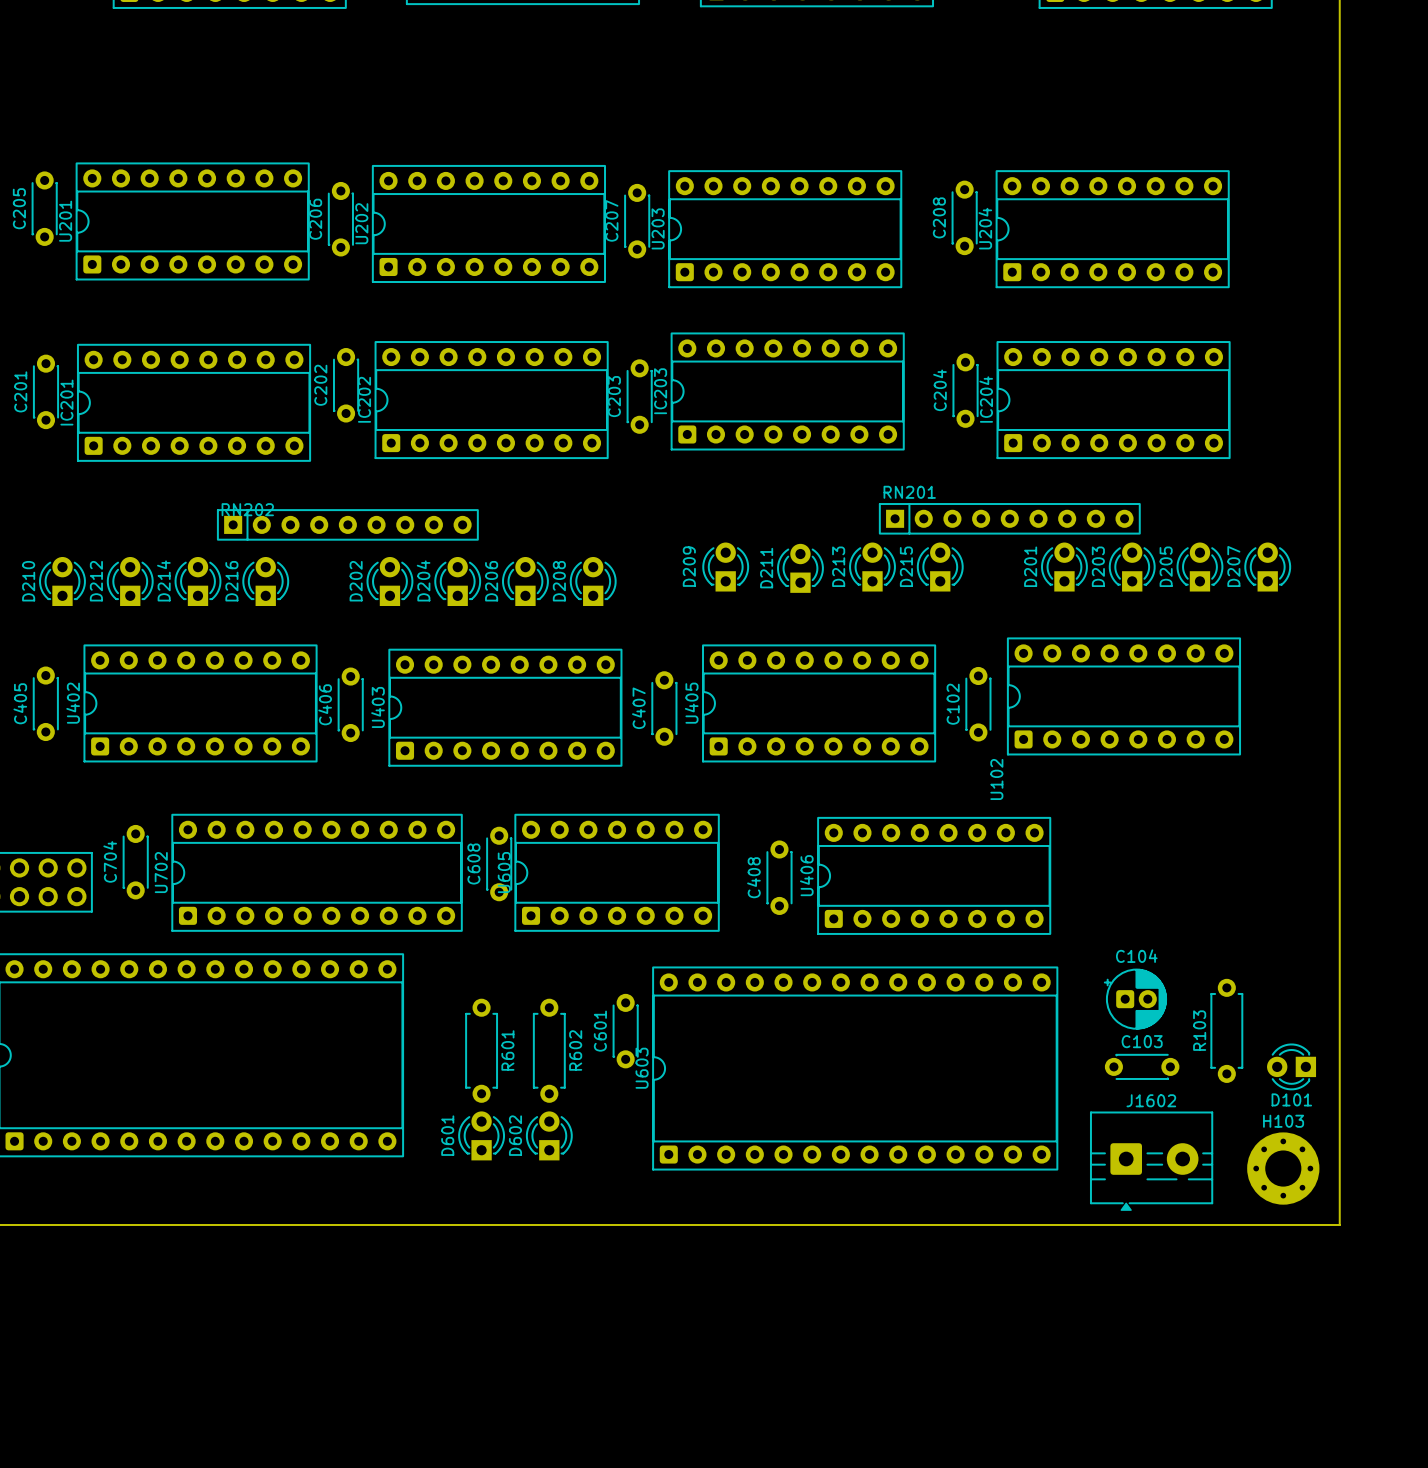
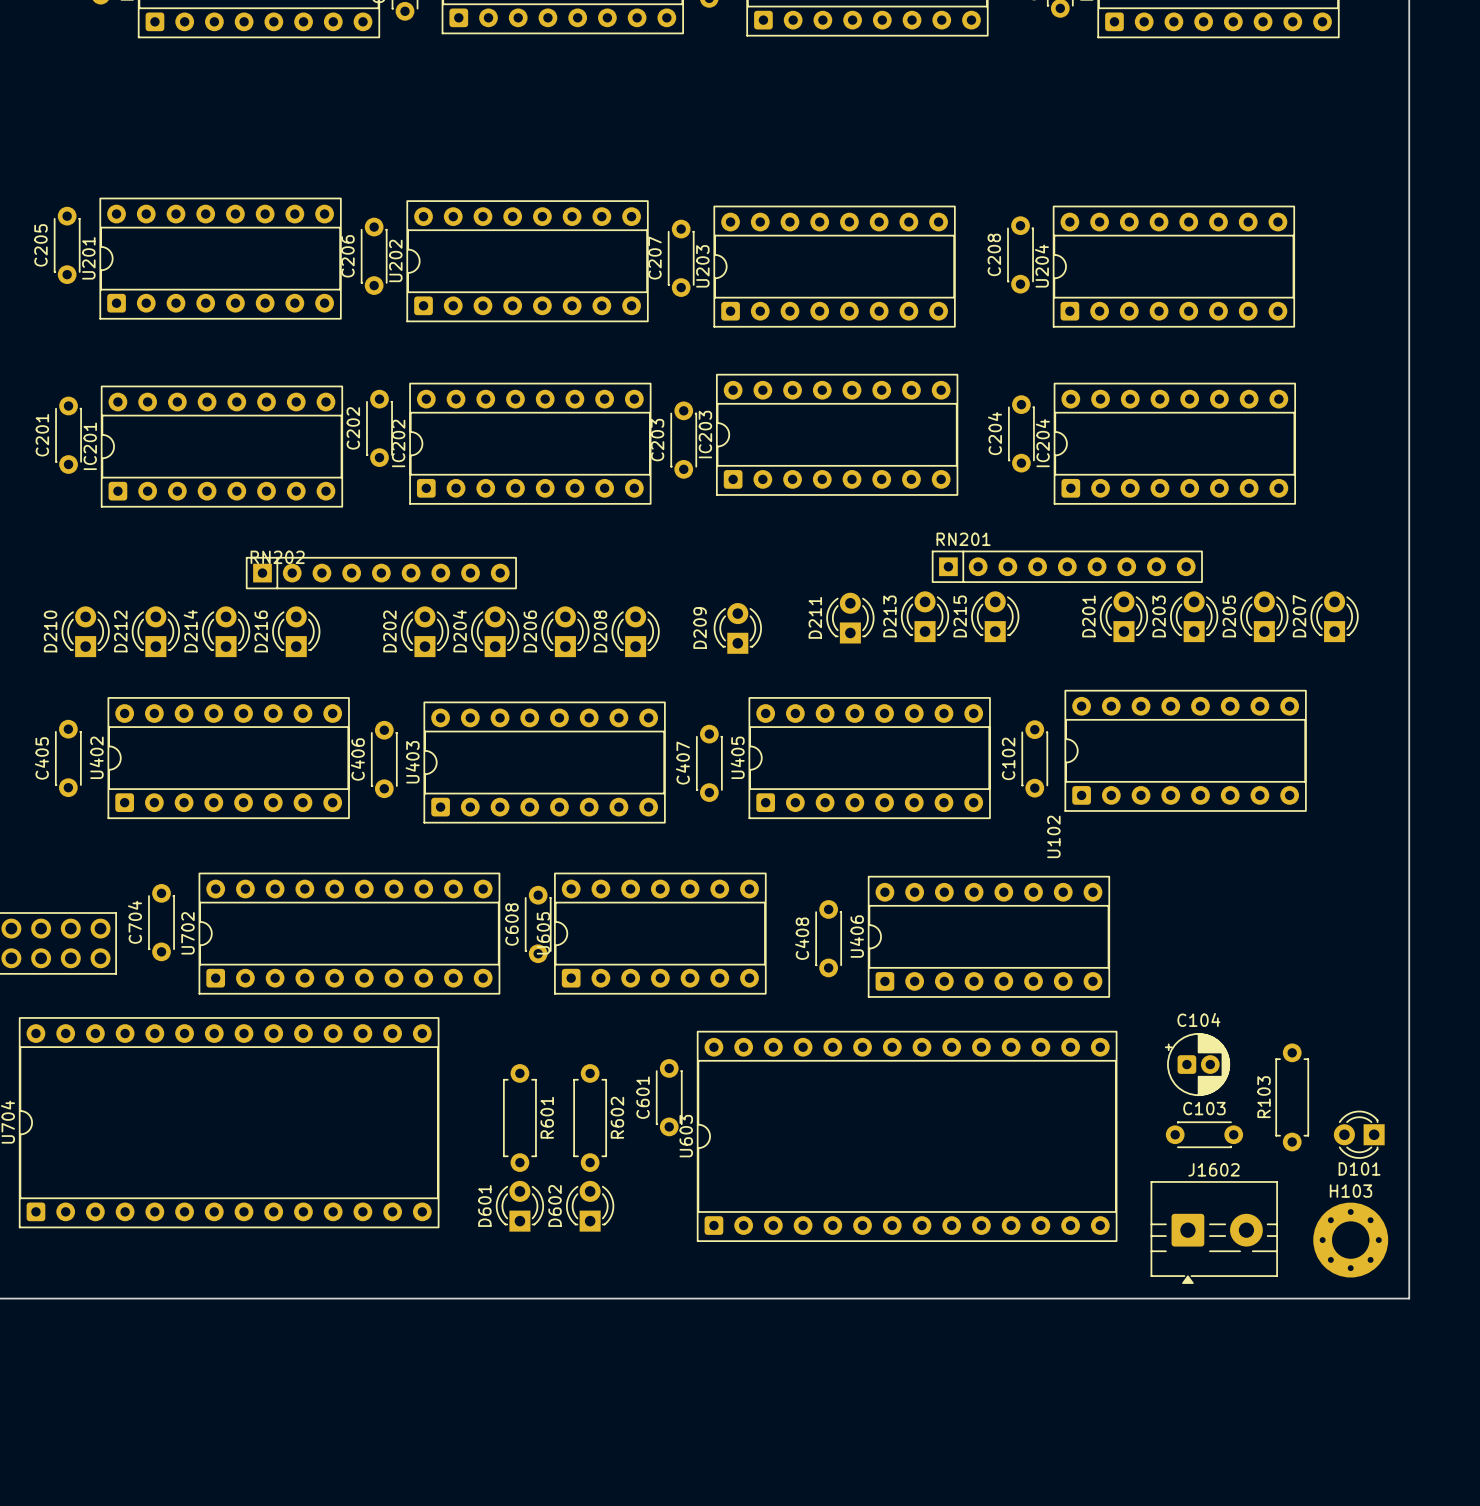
D209 position: (725, 567) -> (737, 628)

